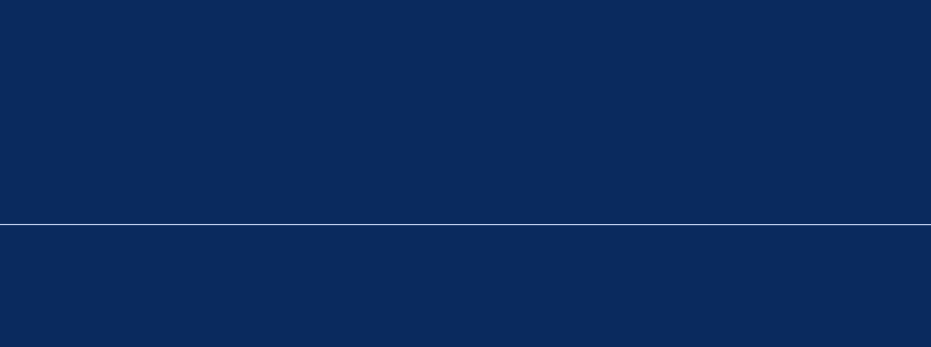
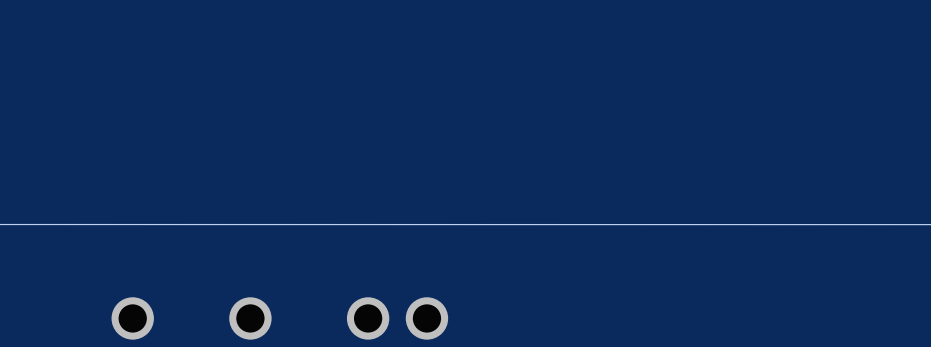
via: none -> (132, 318)
via: none -> (250, 318)
via: none -> (368, 318)
via: none -> (426, 318)

